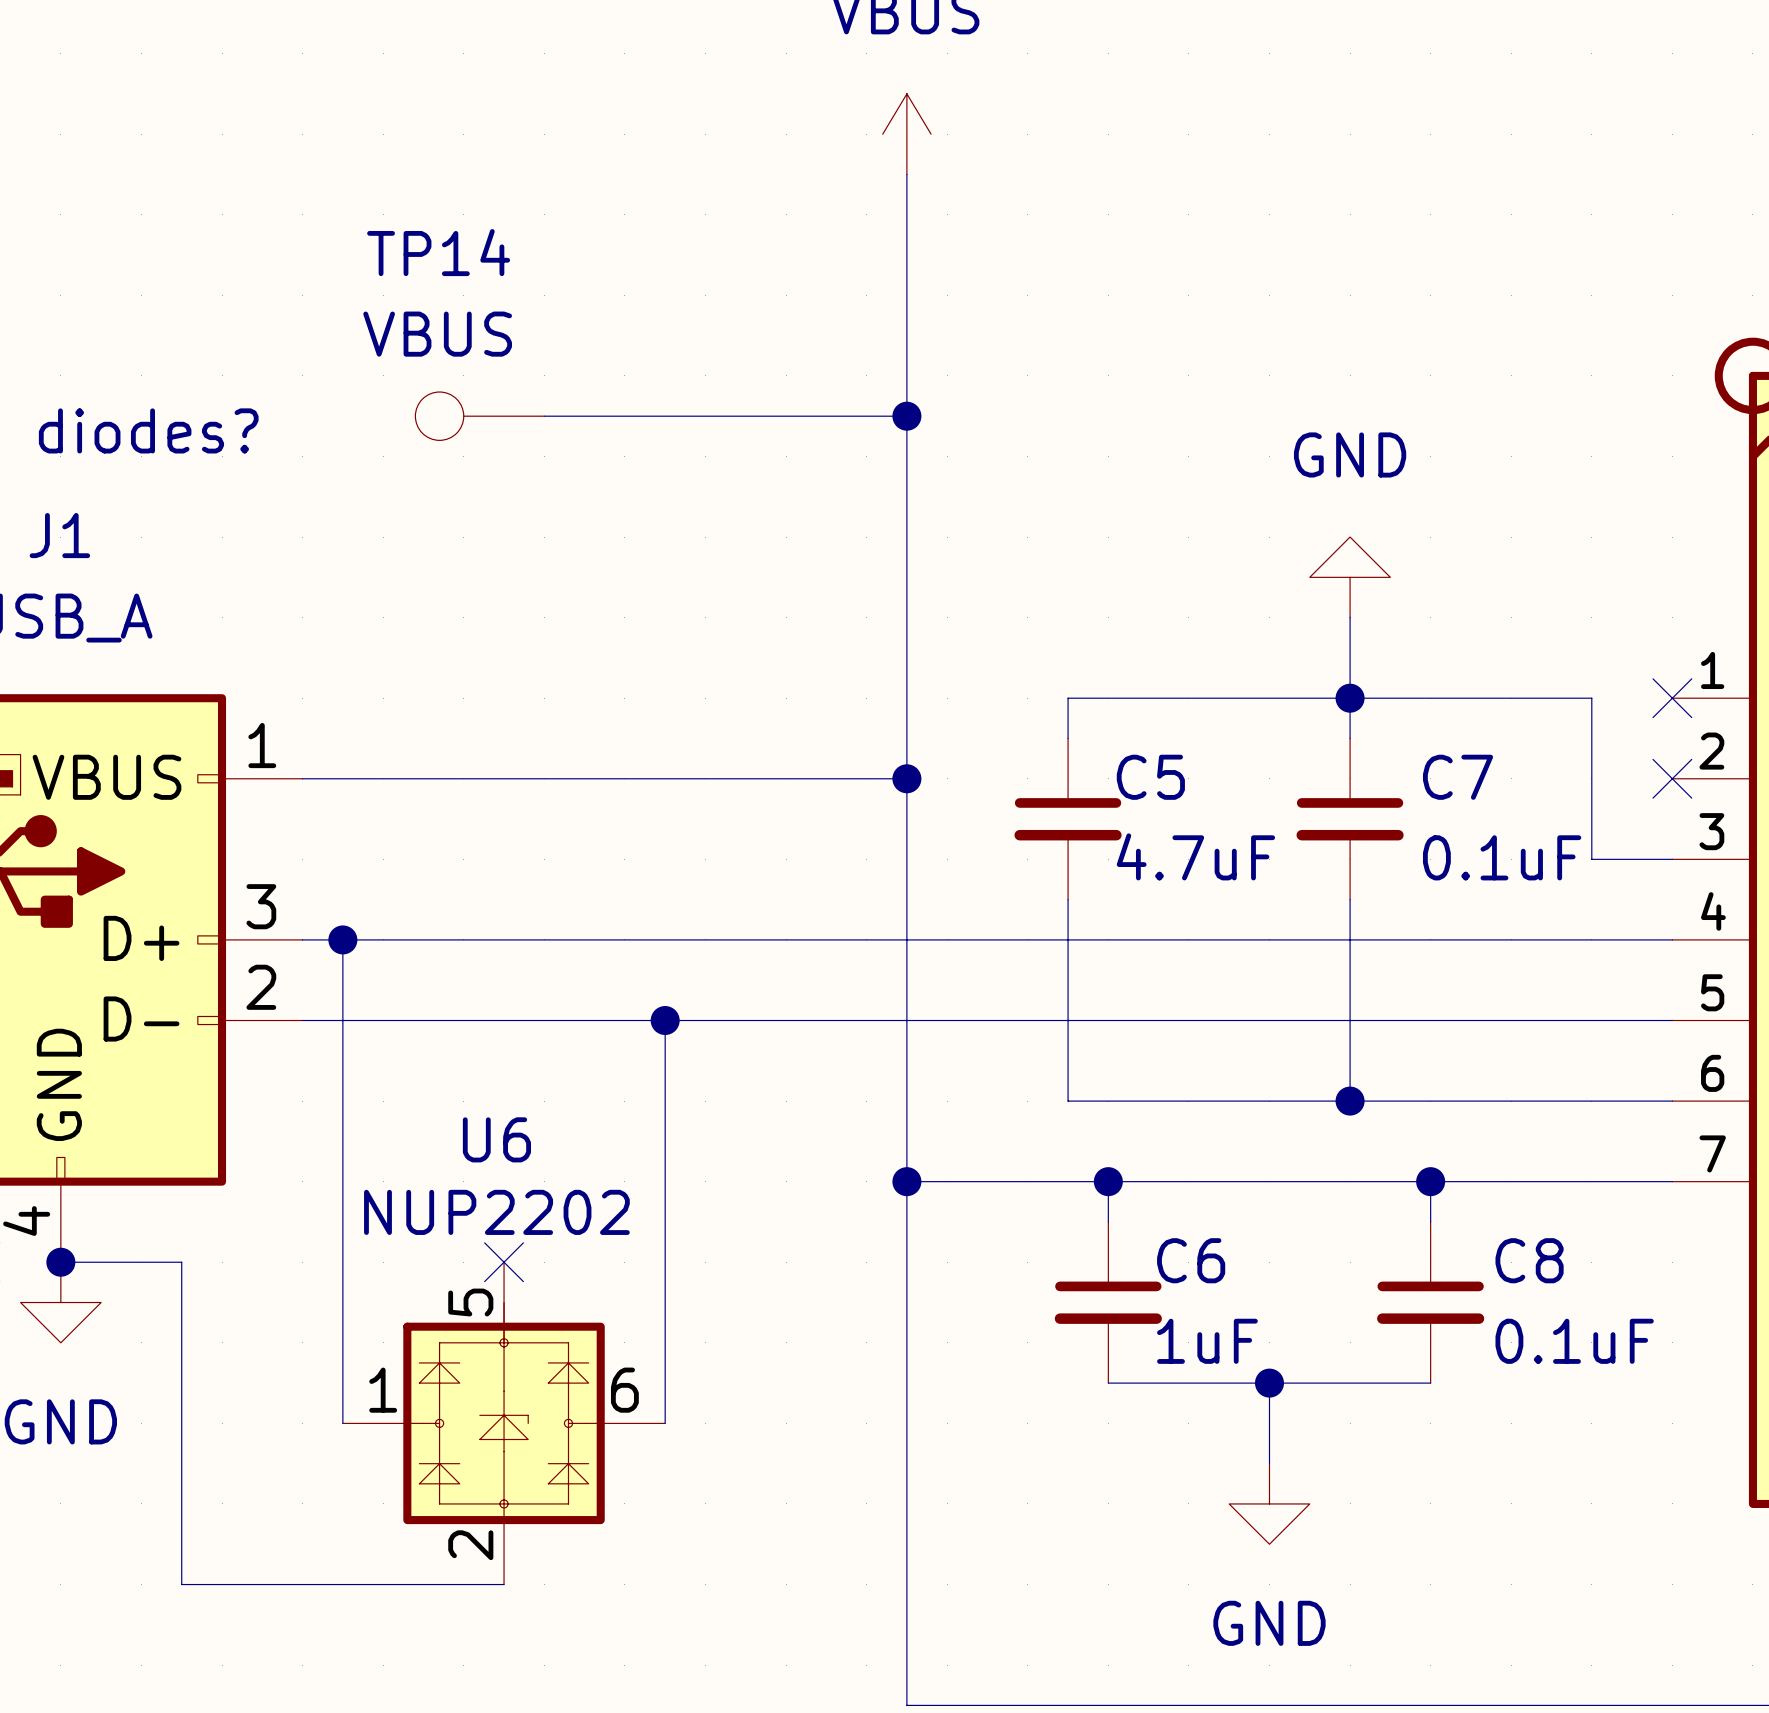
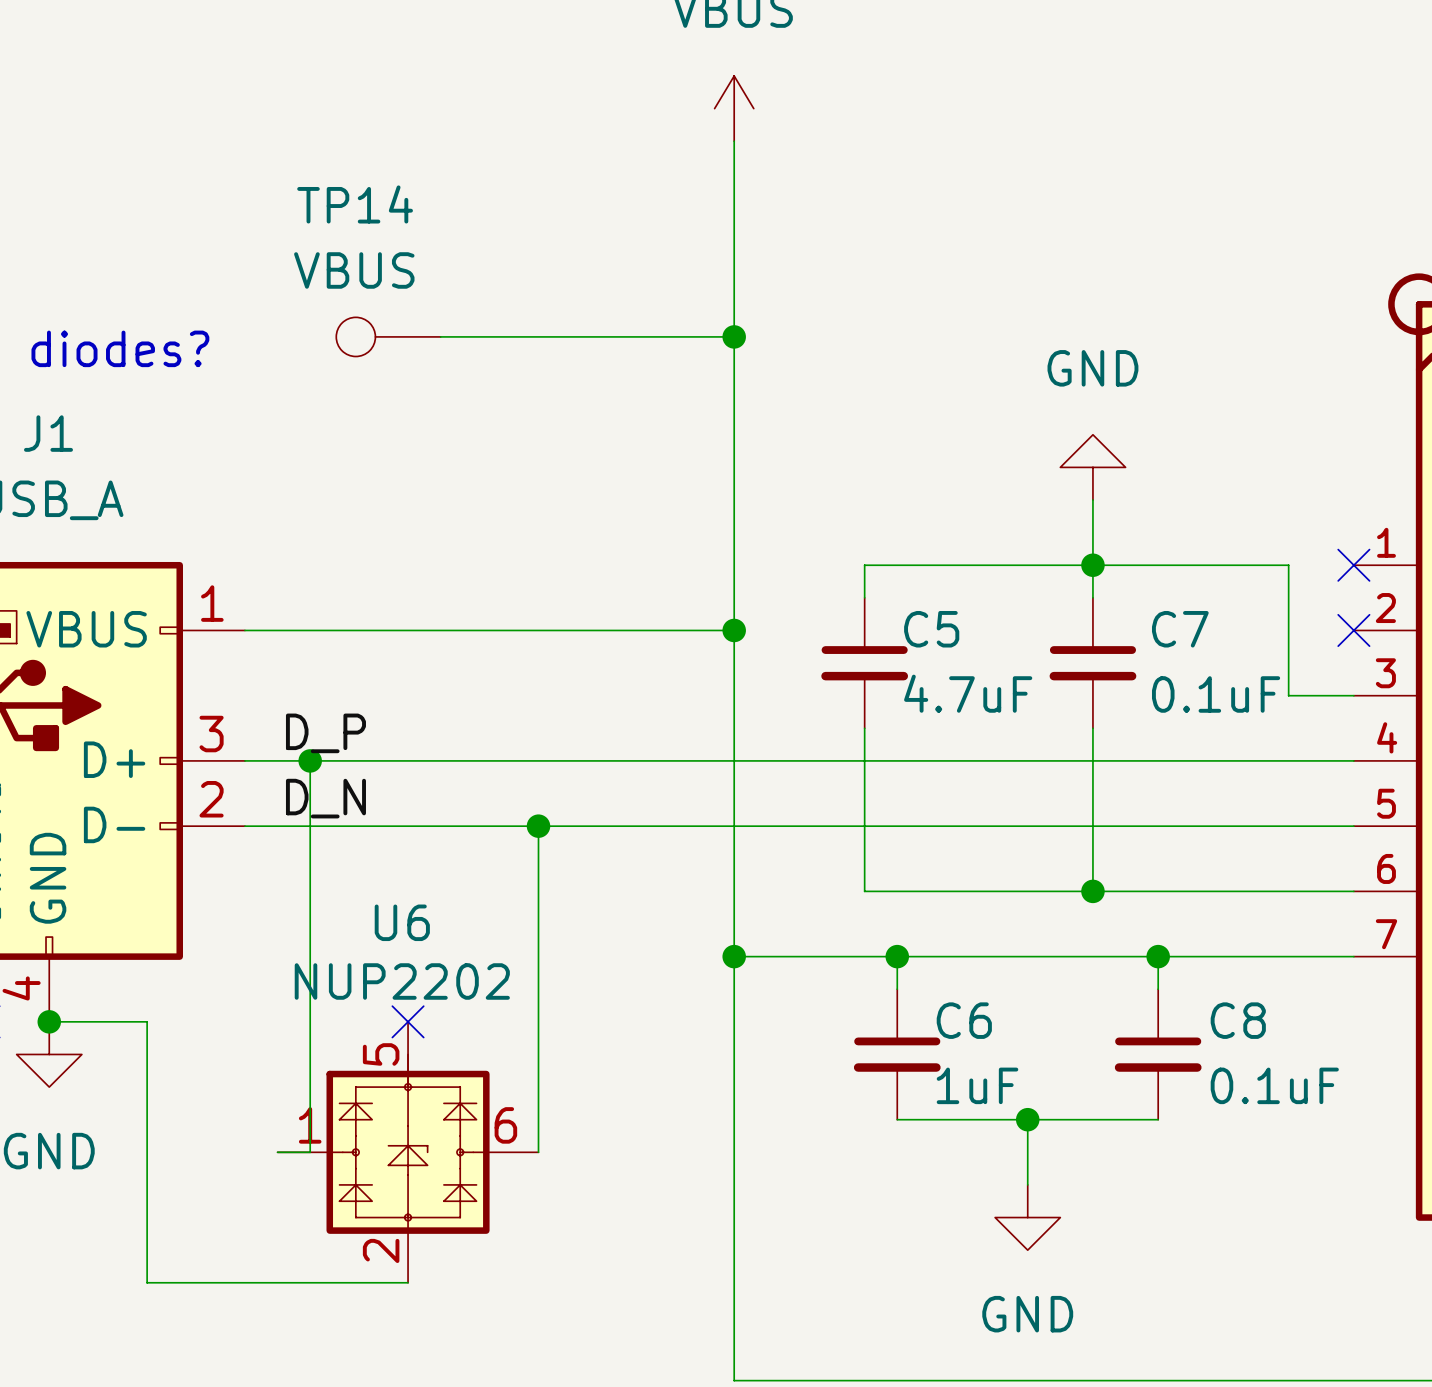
label: none -> D_P (325, 733)
wire: (342, 939) (342, 1423) -> (310, 760) (310, 1152) (277, 1152)
junction position: (342, 939) -> (310, 760)
label: none -> D_N (325, 798)

